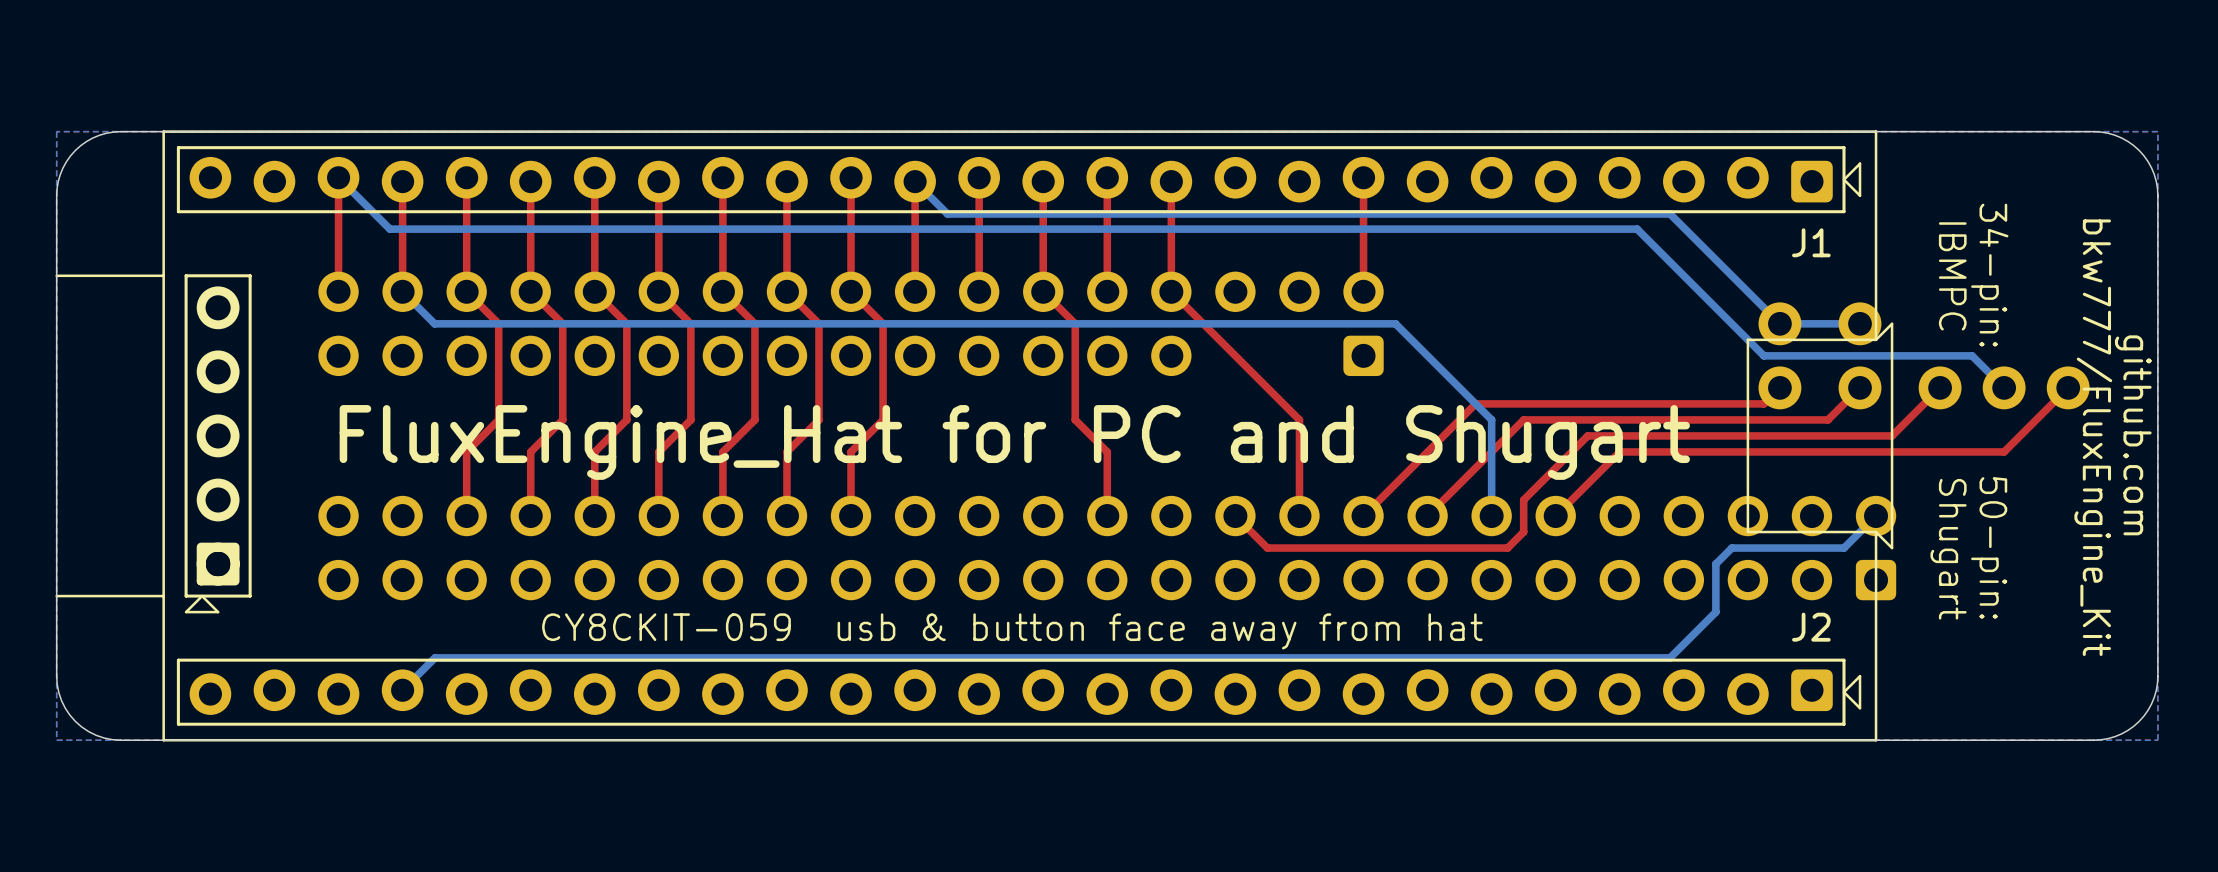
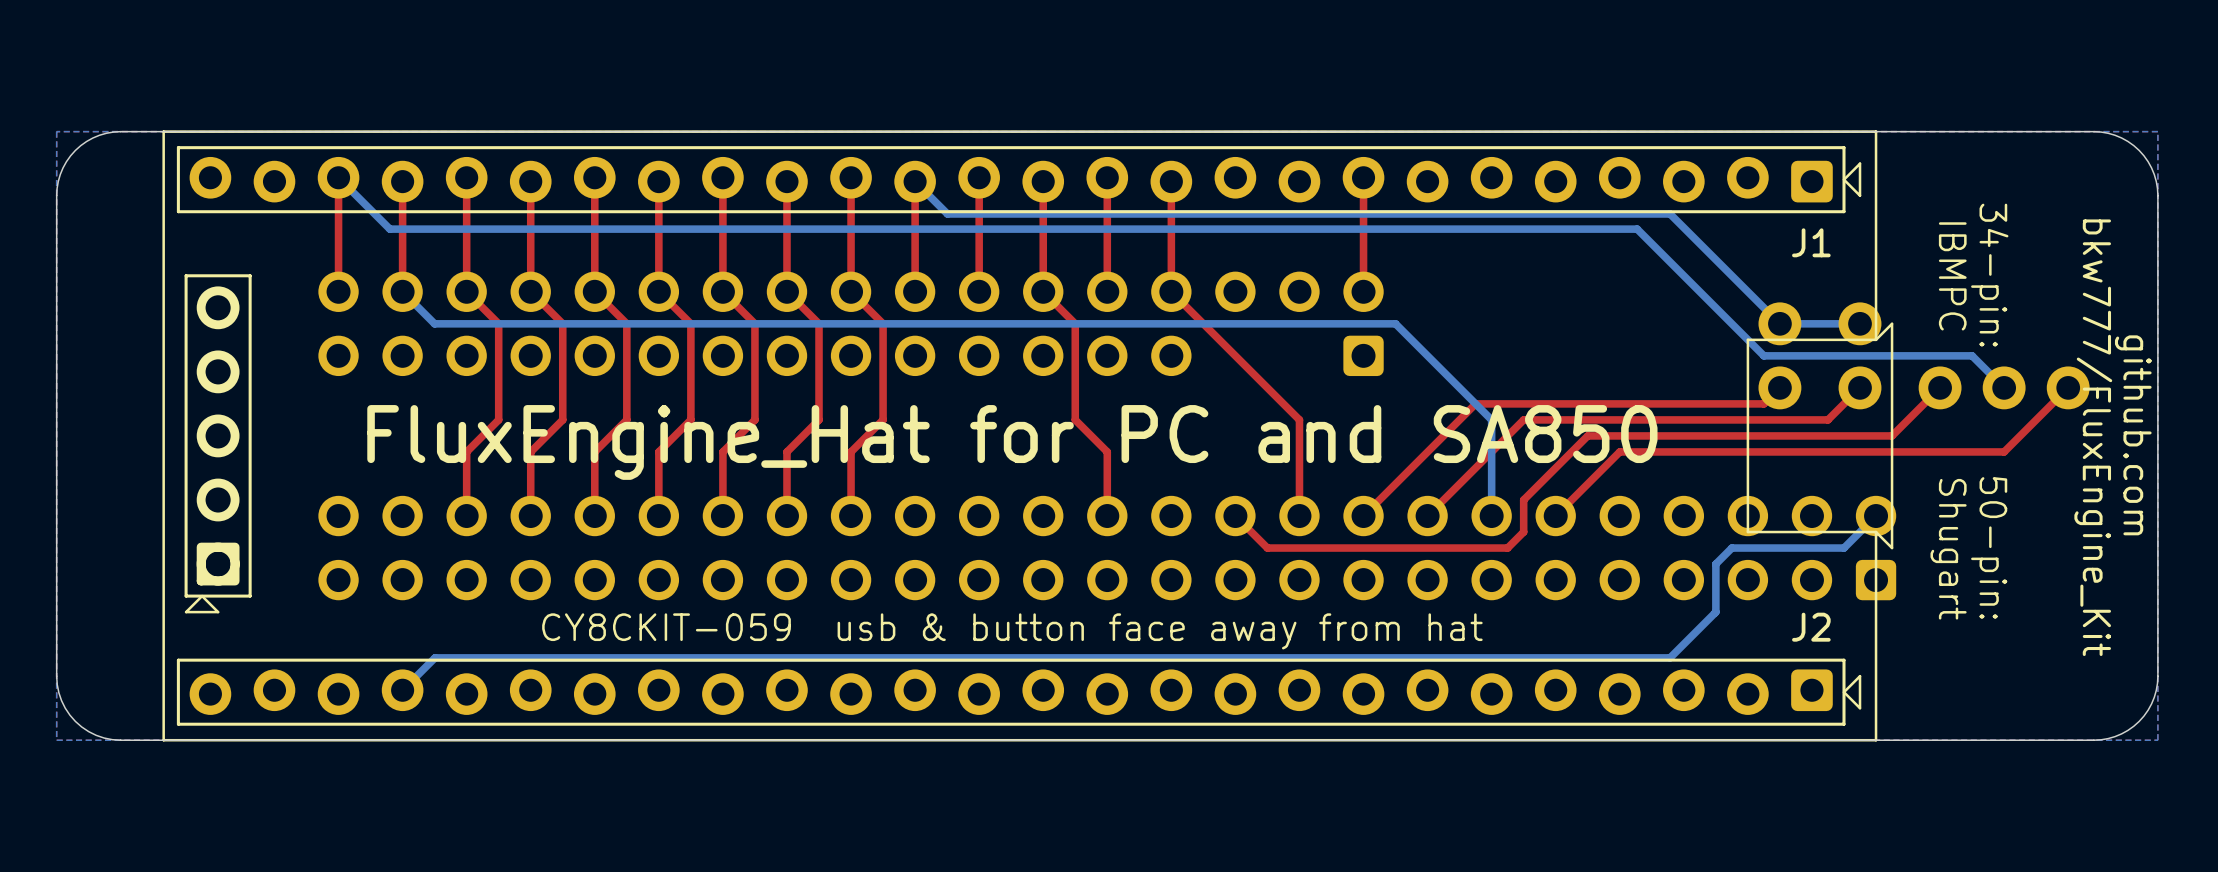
line: (163, 275) (56, 275) -> none
text: FluxEngine_Hat for PC and Shugart (1014, 442) -> FluxEngine_Hat for PC and SA850 (1012, 442)
line: (163, 596) (56, 596) -> none

